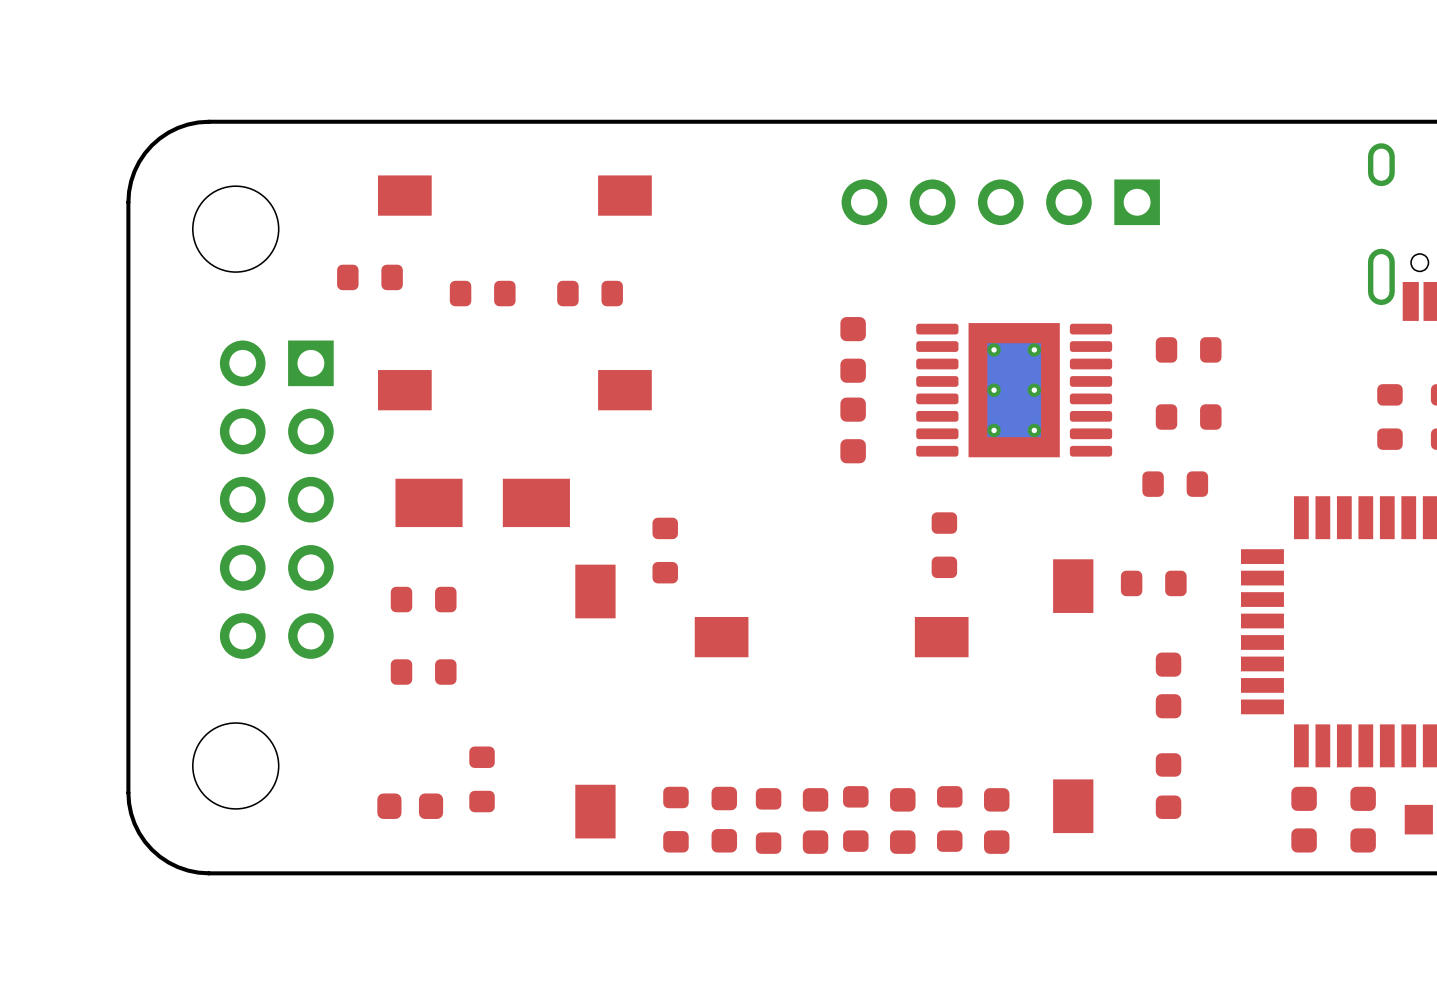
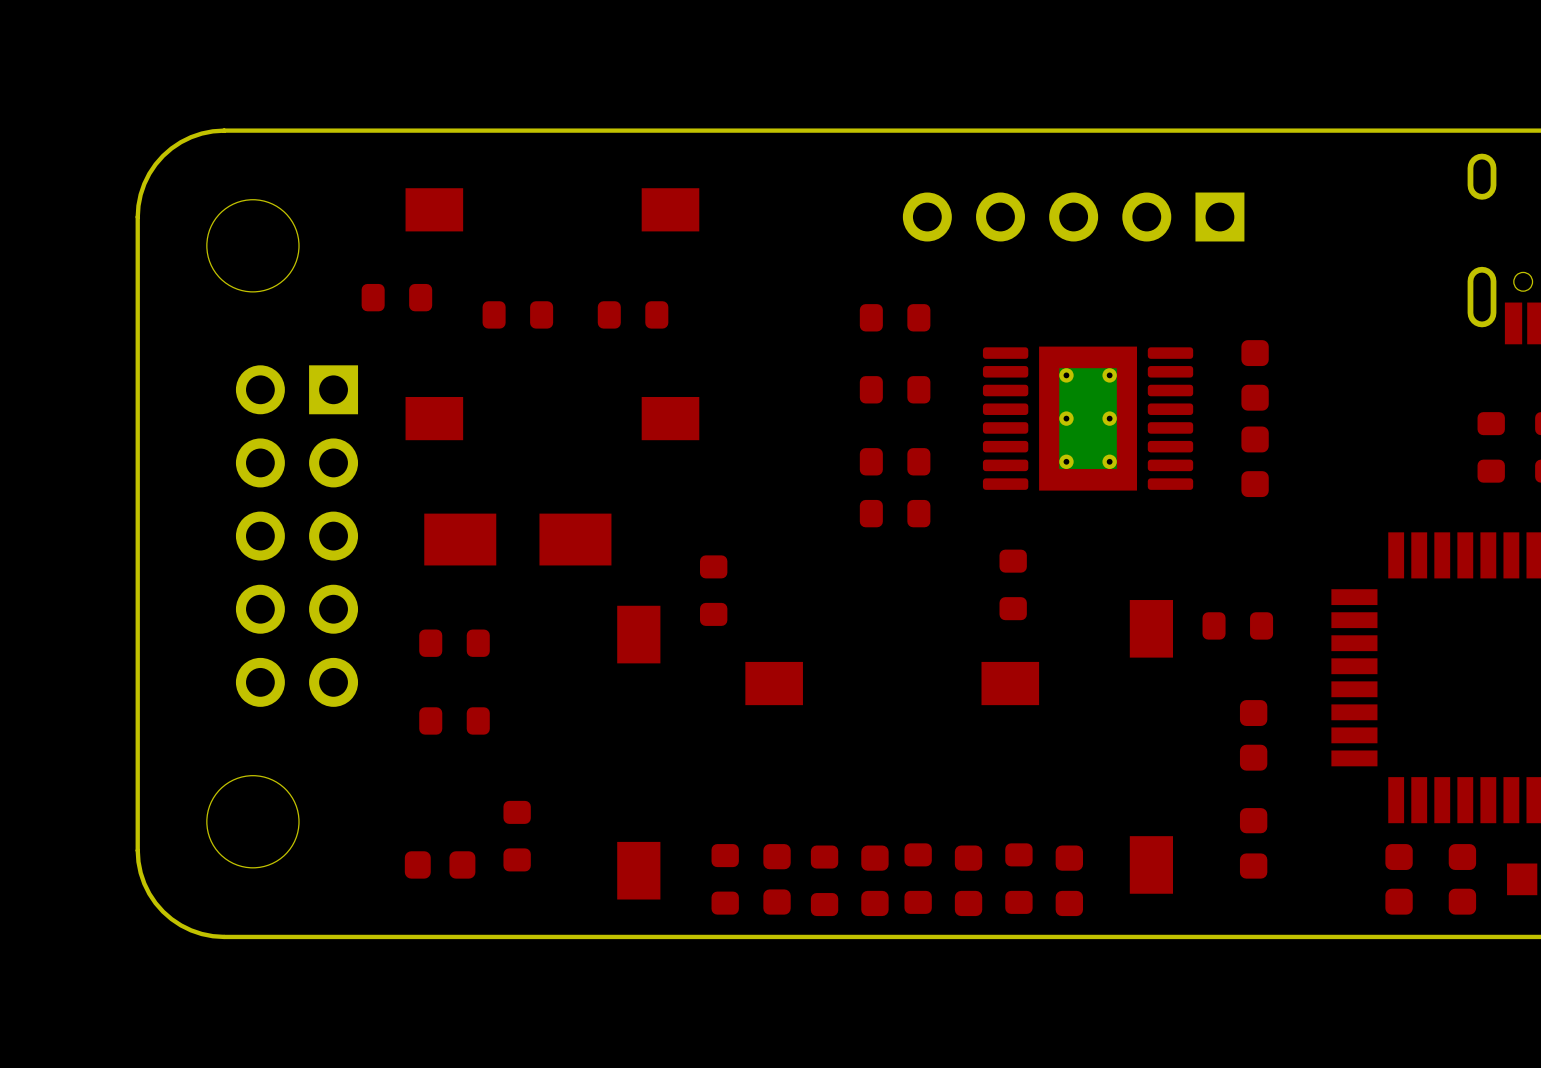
part: none -> (895, 317)
part footprint: [840, 317, 866, 383] -> [859, 376, 931, 404]
part footprint: [1155, 337, 1222, 363] -> [1241, 340, 1269, 411]
part footprint: [840, 397, 866, 464] -> [859, 448, 931, 476]
part footprint: [1155, 404, 1222, 430] -> [1241, 426, 1269, 498]
part: none -> (895, 513)
part: (1175, 484) -> none

